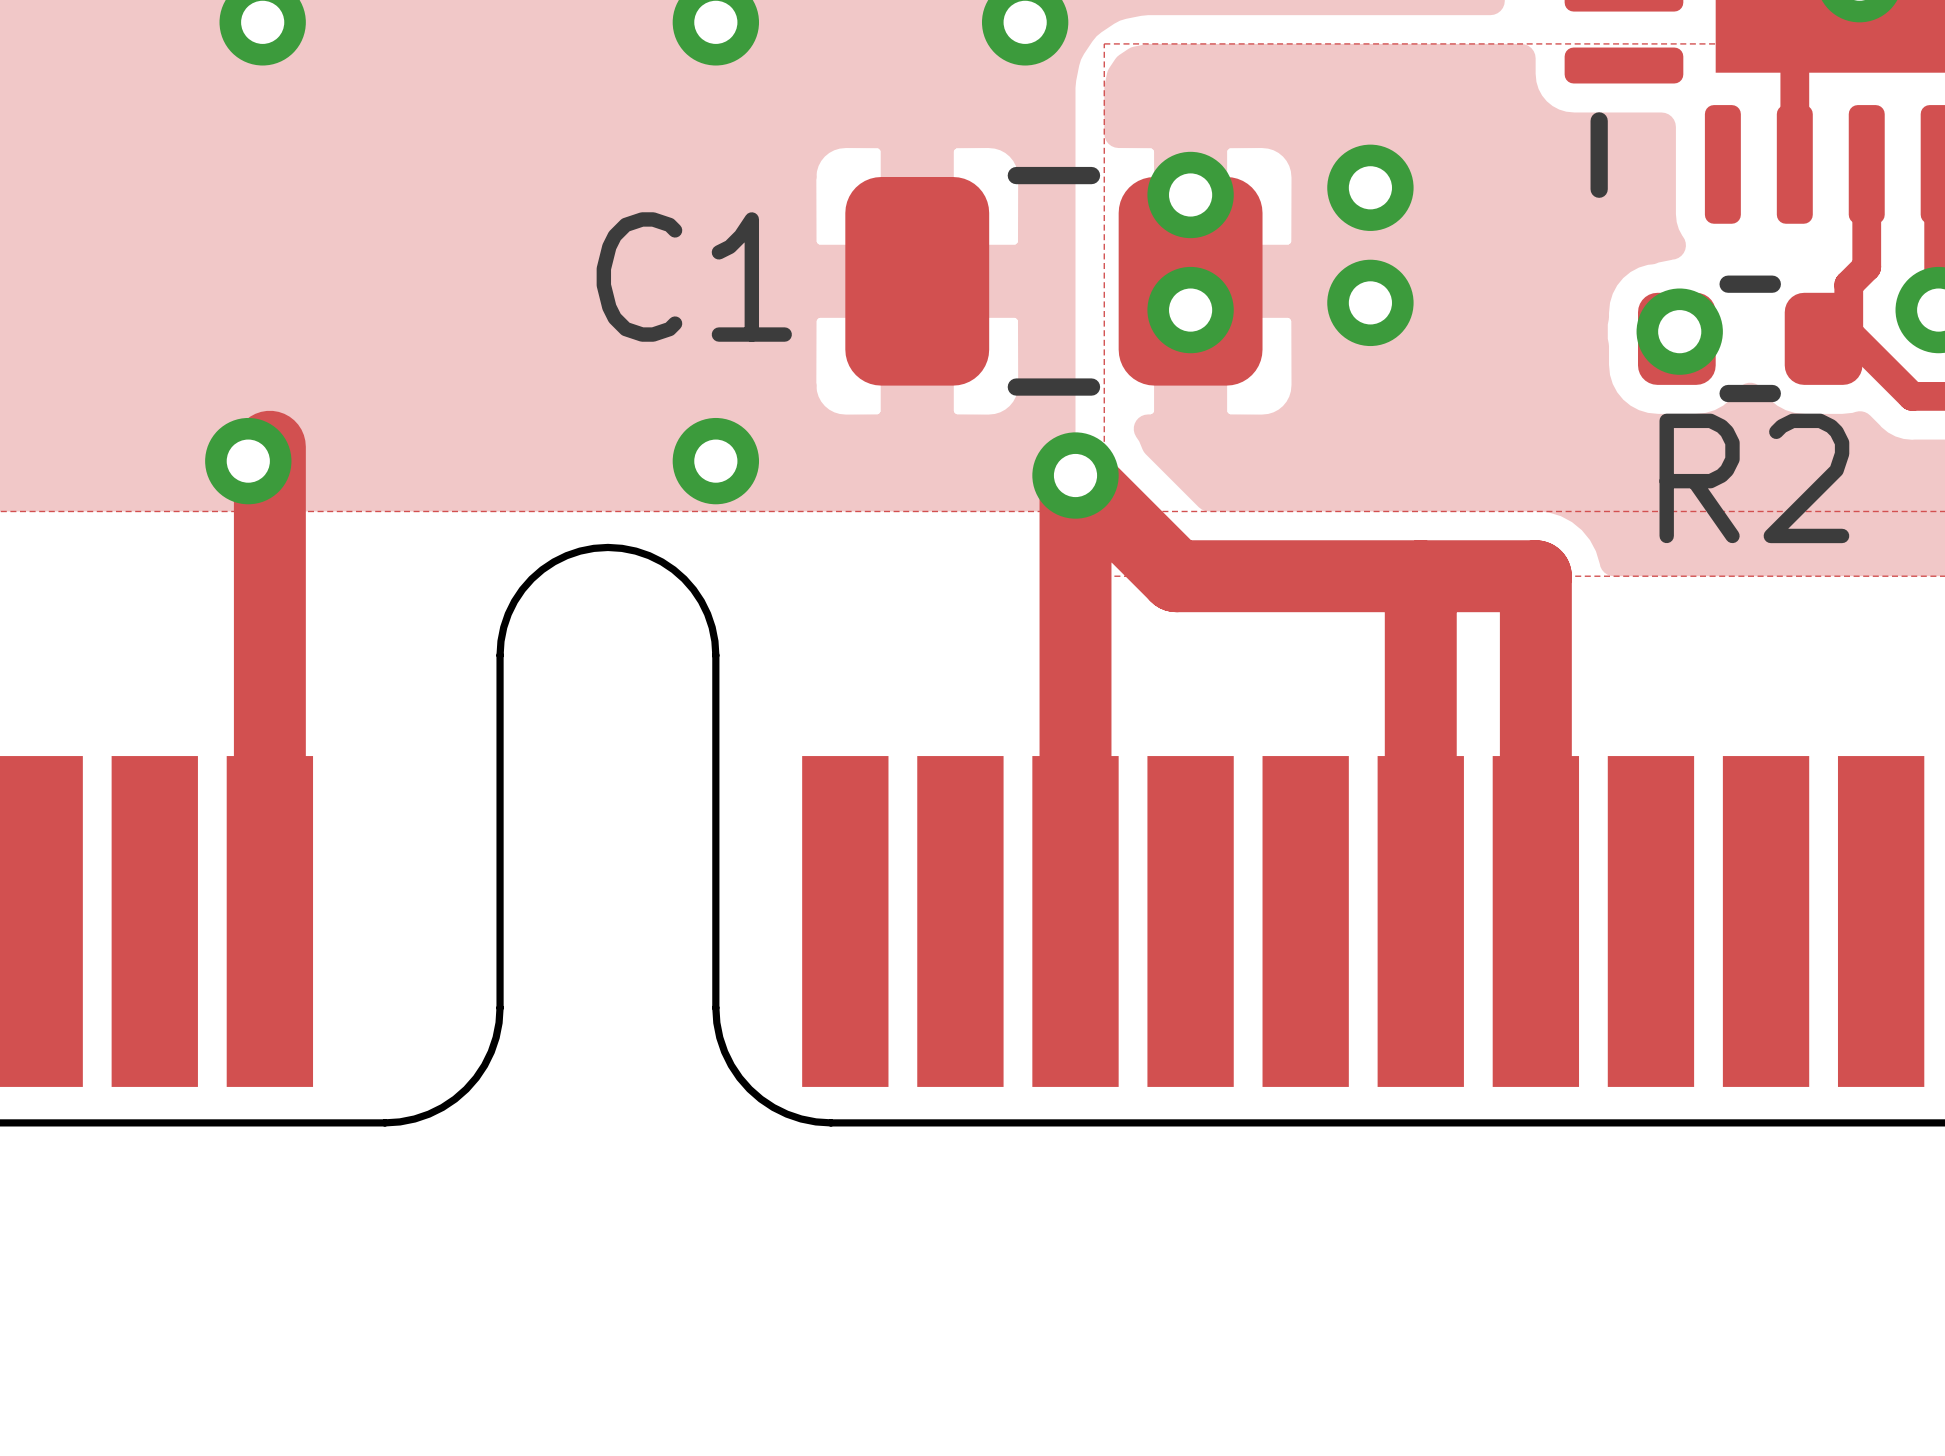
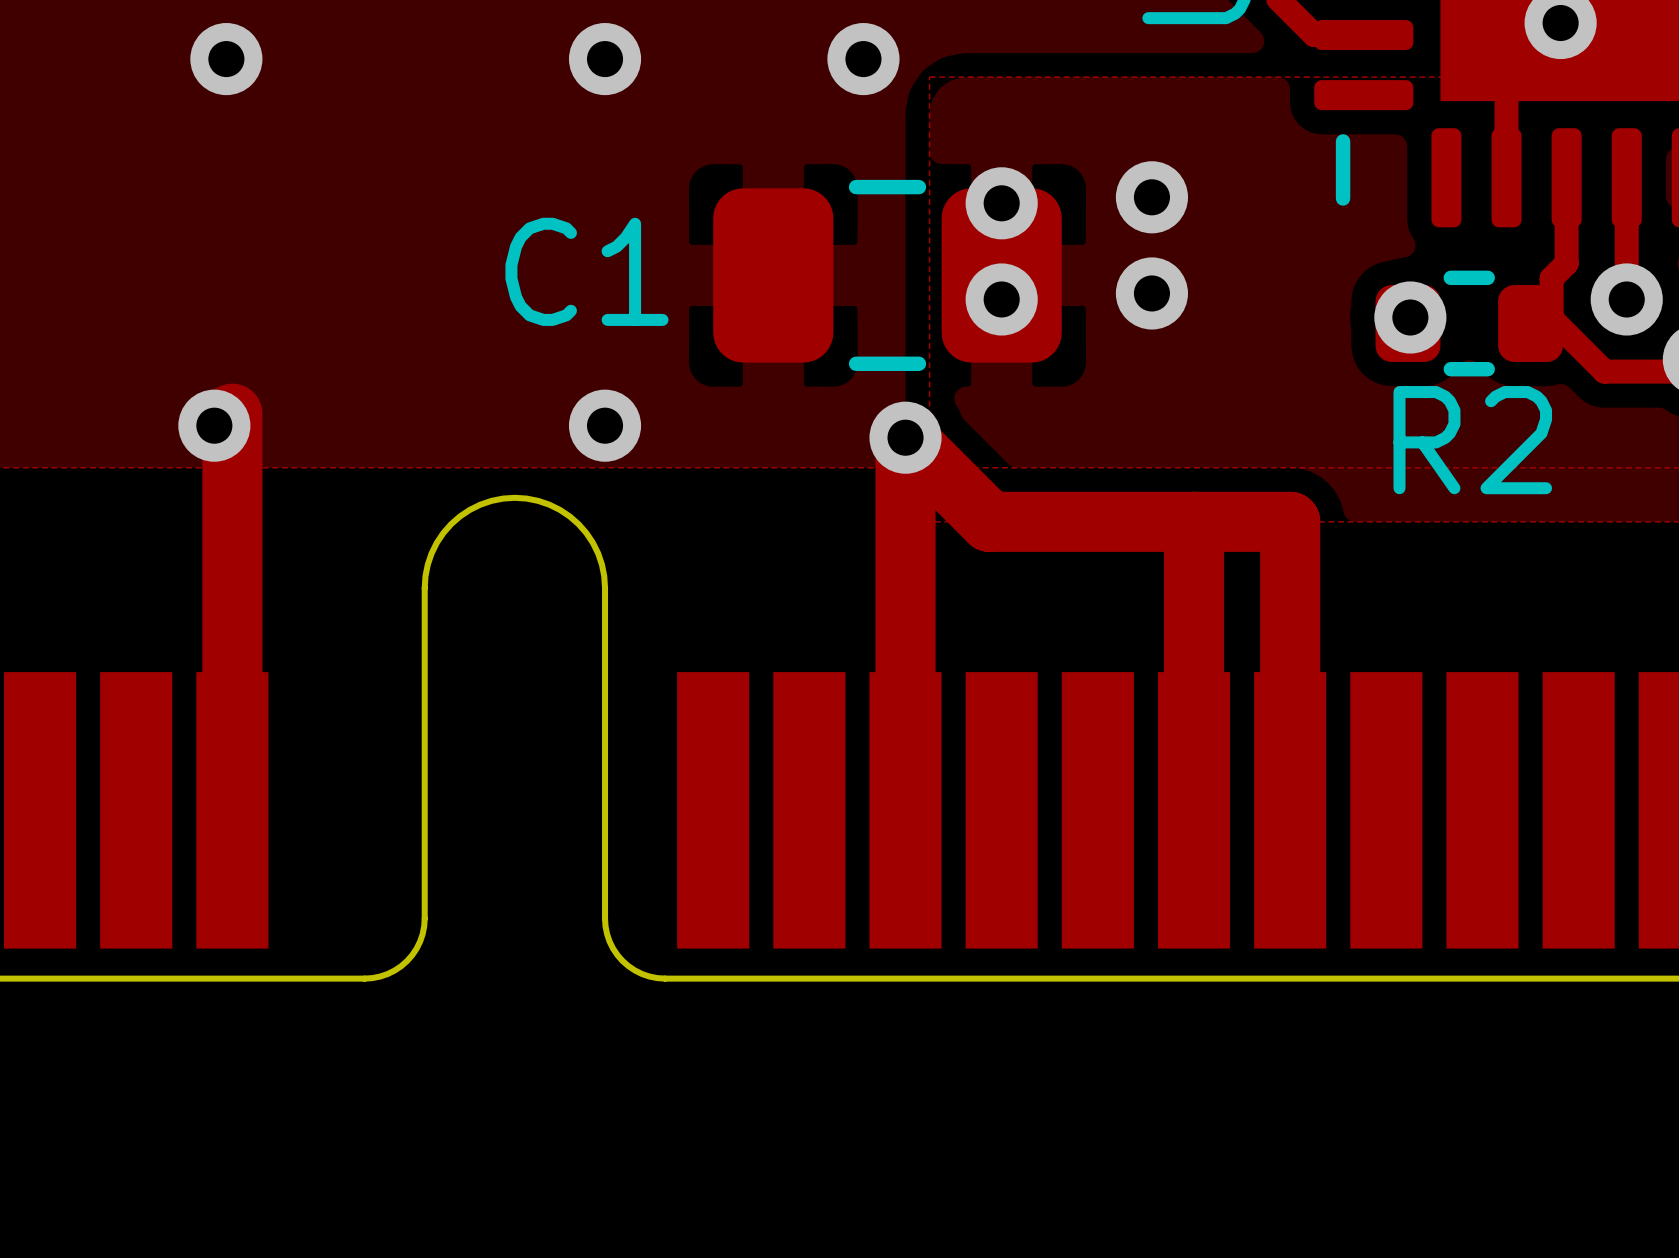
board edge: (500, 1007) (499, 1022) (491, 1051) (476, 1077) (466, 1089) (455, 1099) (429, 1114) (399, 1121) (384, 1122) -> (424, 882) (422, 934) (416, 948) (407, 961) (394, 970) (380, 976) (328, 978)
board edge: (715, 1007) (716, 1022) (724, 1051) (739, 1077) (749, 1089) (760, 1099) (786, 1114) (815, 1121) (830, 1122) -> (605, 882) (607, 934) (613, 948) (622, 961) (635, 970) (649, 976) (701, 978)

